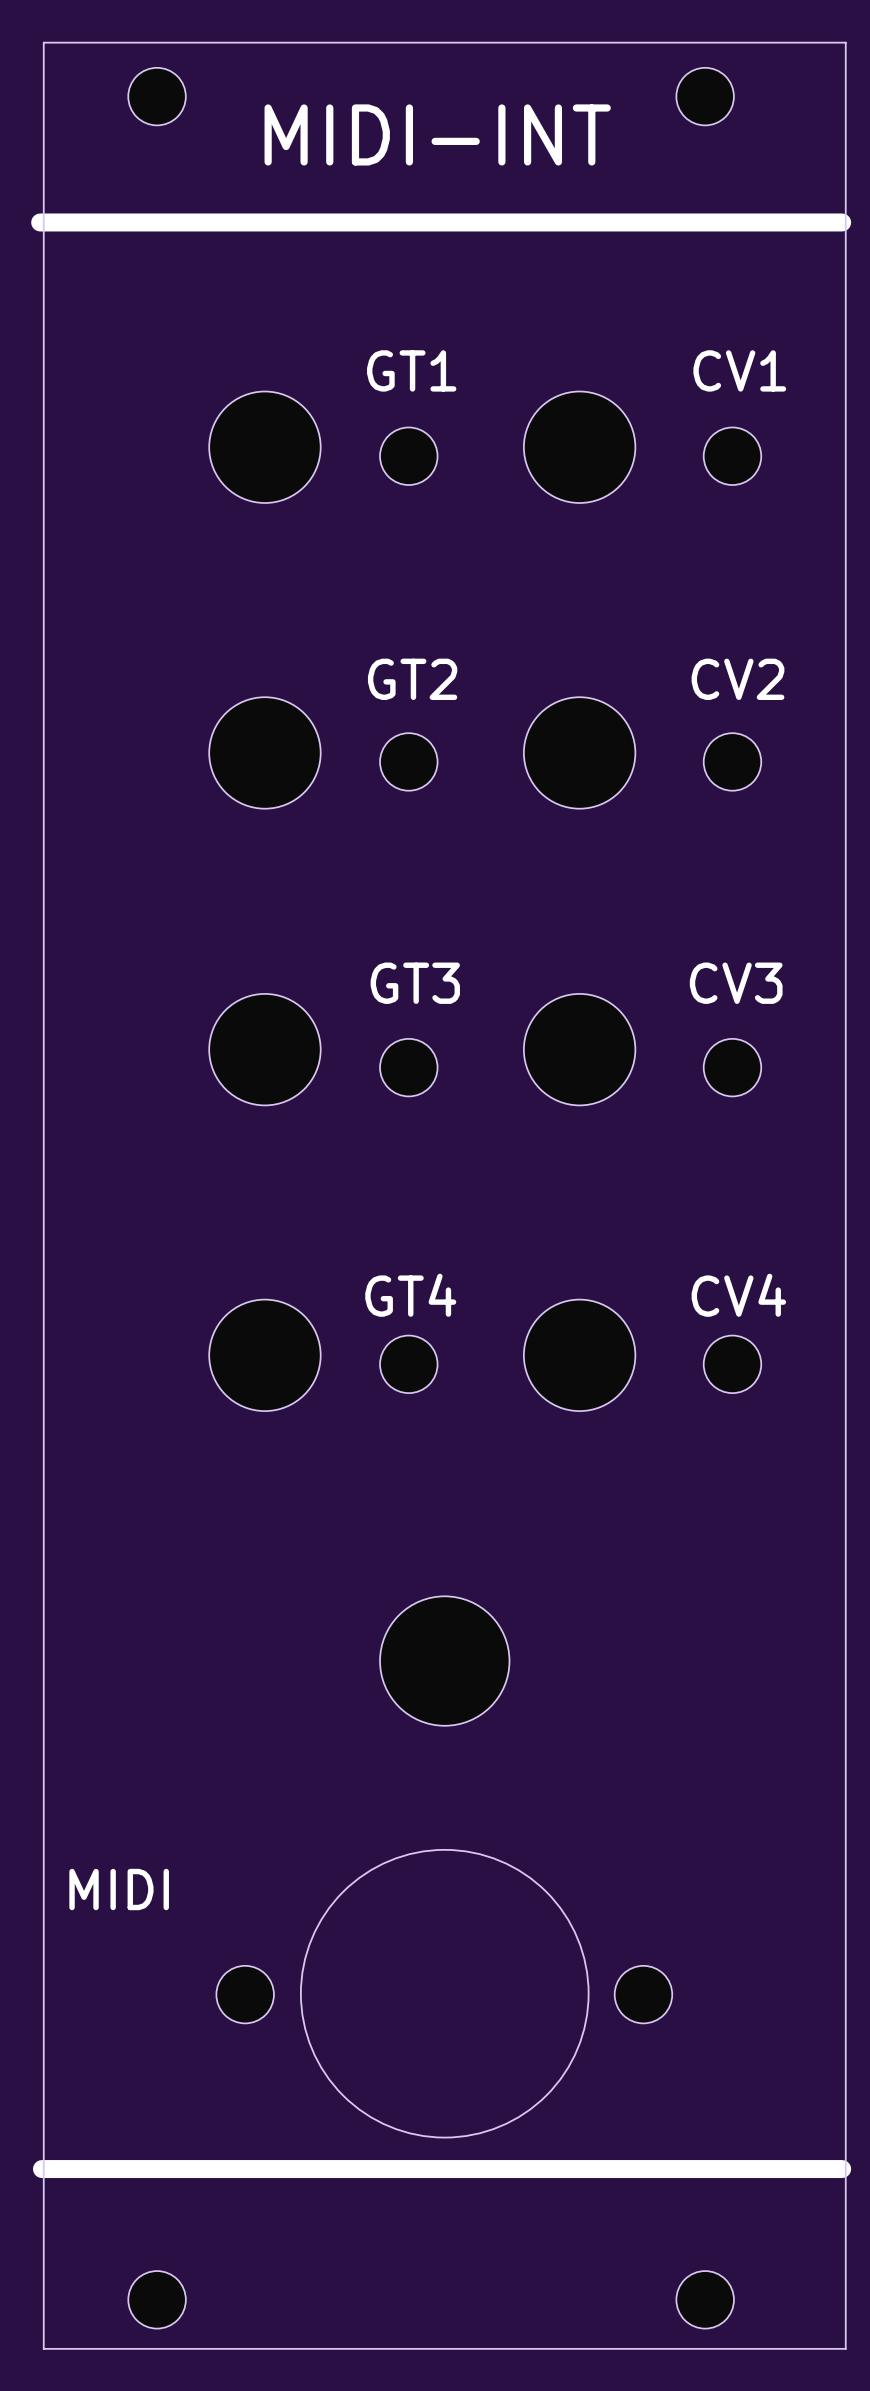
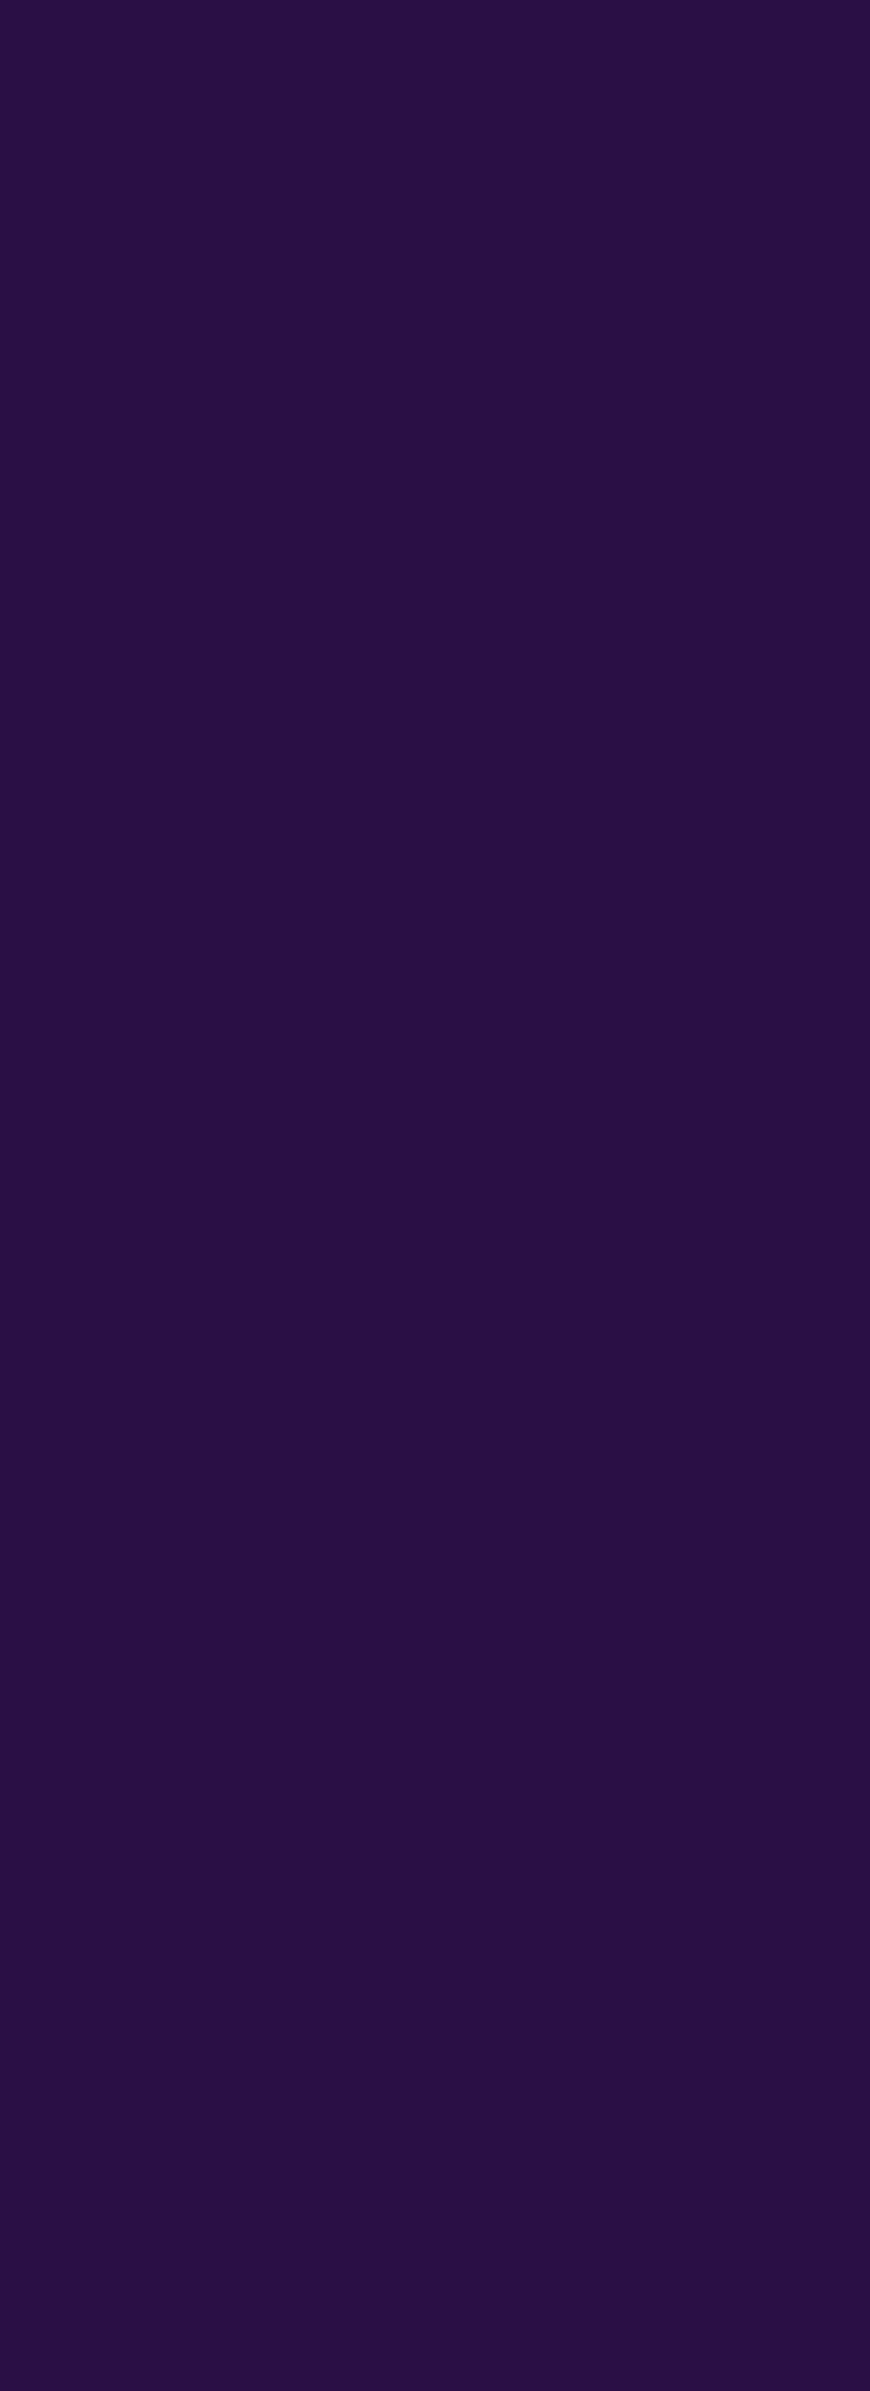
board edge: (43, 42) (845, 42) (845, 2348) (43, 2348) (43, 42) -> none
part: (157, 96) -> none
part: (705, 96) -> none
text: MIDI-INT (437, 134) -> none
line: (40, 222) (842, 222) -> none
text: GT1 (411, 370) -> none
text: CV1 (739, 370) -> none
part: (264, 447) -> none
part: (579, 447) -> none
part: (408, 456) -> none
part: (732, 456) -> none
text: GT2 (412, 679) -> none
text: CV2 (737, 679) -> none
part: (264, 752) -> none
part: (579, 752) -> none
part: (408, 761) -> none
part: (732, 761) -> none
text: GT3 (415, 983) -> none
text: CV3 (736, 983) -> none
part: (264, 1049) -> none
part: (579, 1049) -> none
part: (408, 1067) -> none
part: (732, 1067) -> none
text: GT4 (410, 1295) -> none
text: CV4 (738, 1295) -> none
part: (264, 1355) -> none
part: (579, 1355) -> none
part: (408, 1364) -> none
part: (732, 1364) -> none
part: (444, 1661) -> none
round board edge: [300, 1848, 590, 2139] -> none
text: MIDI (119, 1889) -> none
part: (245, 1994) -> none
part: (643, 1994) -> none
line: (41, 2169) (842, 2169) -> none
part: (157, 2299) -> none
part: (705, 2299) -> none

